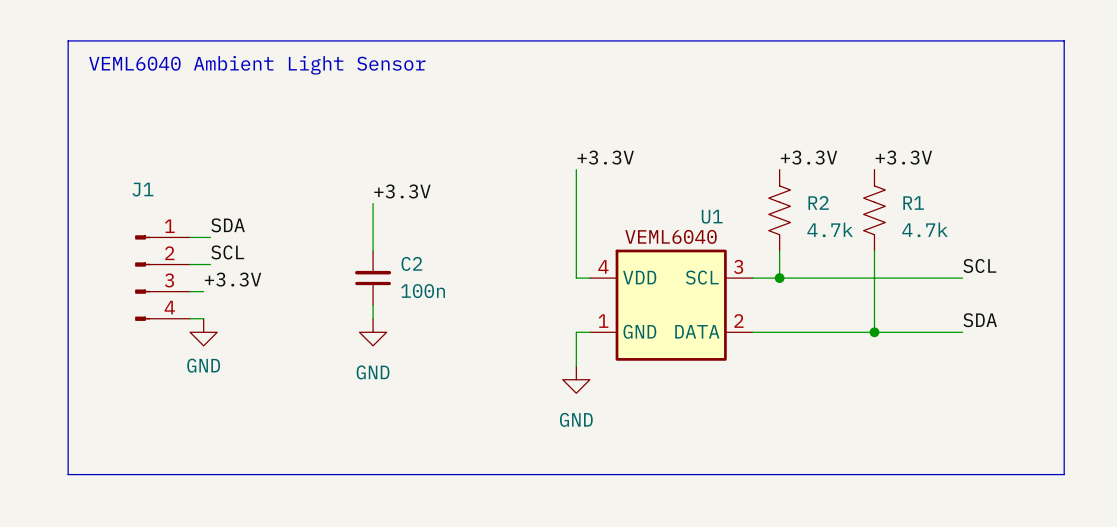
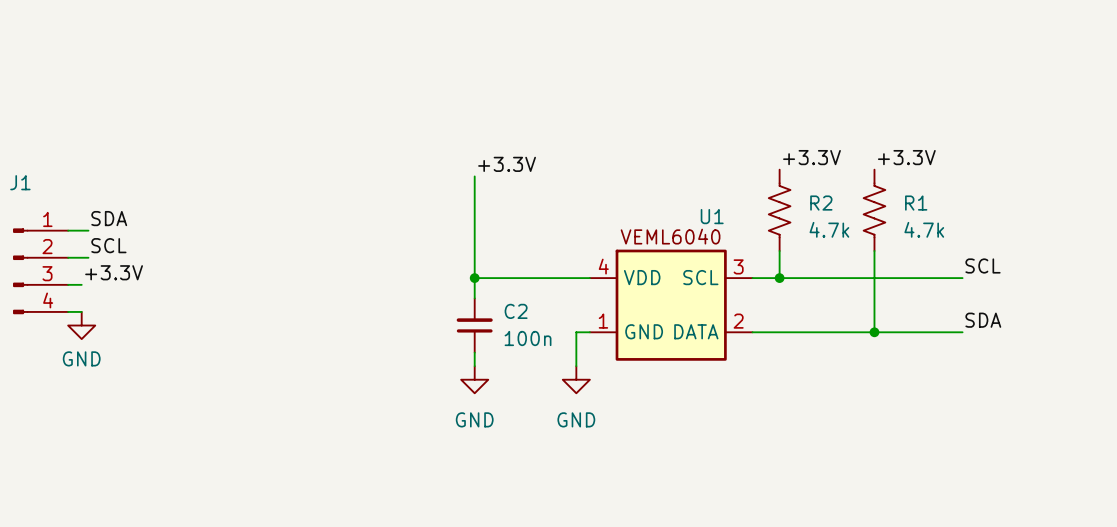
line: (68, 40) (1064, 40) (1064, 474) (68, 474) (68, 40) -> none
text: VEML6040 Ambient Light Sensor (257, 65) -> none
label: +3.3V (605, 157) -> none
label: none -> +3.3V (507, 164)
wire: (576, 169) (576, 278) -> (474, 278) (576, 278)
wire: none -> (474, 176) (474, 298)
label: +3.3V (402, 191) -> none
wire: (373, 203) (373, 250) -> none
label position: SDA (228, 225) -> SDA (109, 218)
wire: (190, 237) (210, 237) -> (68, 230) (88, 230)
label position: SCL (227, 252) -> SCL (108, 245)
wire: (190, 264) (210, 264) -> (68, 257) (88, 257)
J1 position: (162, 278) -> (40, 271)
C2 position: (373, 278) -> (474, 325)
junction: none -> (474, 278)
label position: +3.3V (233, 279) -> +3.3V (114, 272)
wire: (190, 291) (203, 291) -> (68, 284) (81, 284)
wire: (373, 305) (373, 318) -> (474, 352) (474, 366)
wire: (190, 318) (203, 318) -> (68, 311) (81, 311)
power symbol position: GND (203, 332) -> GND (81, 325)
power symbol position: GND (373, 332) -> GND (474, 379)

